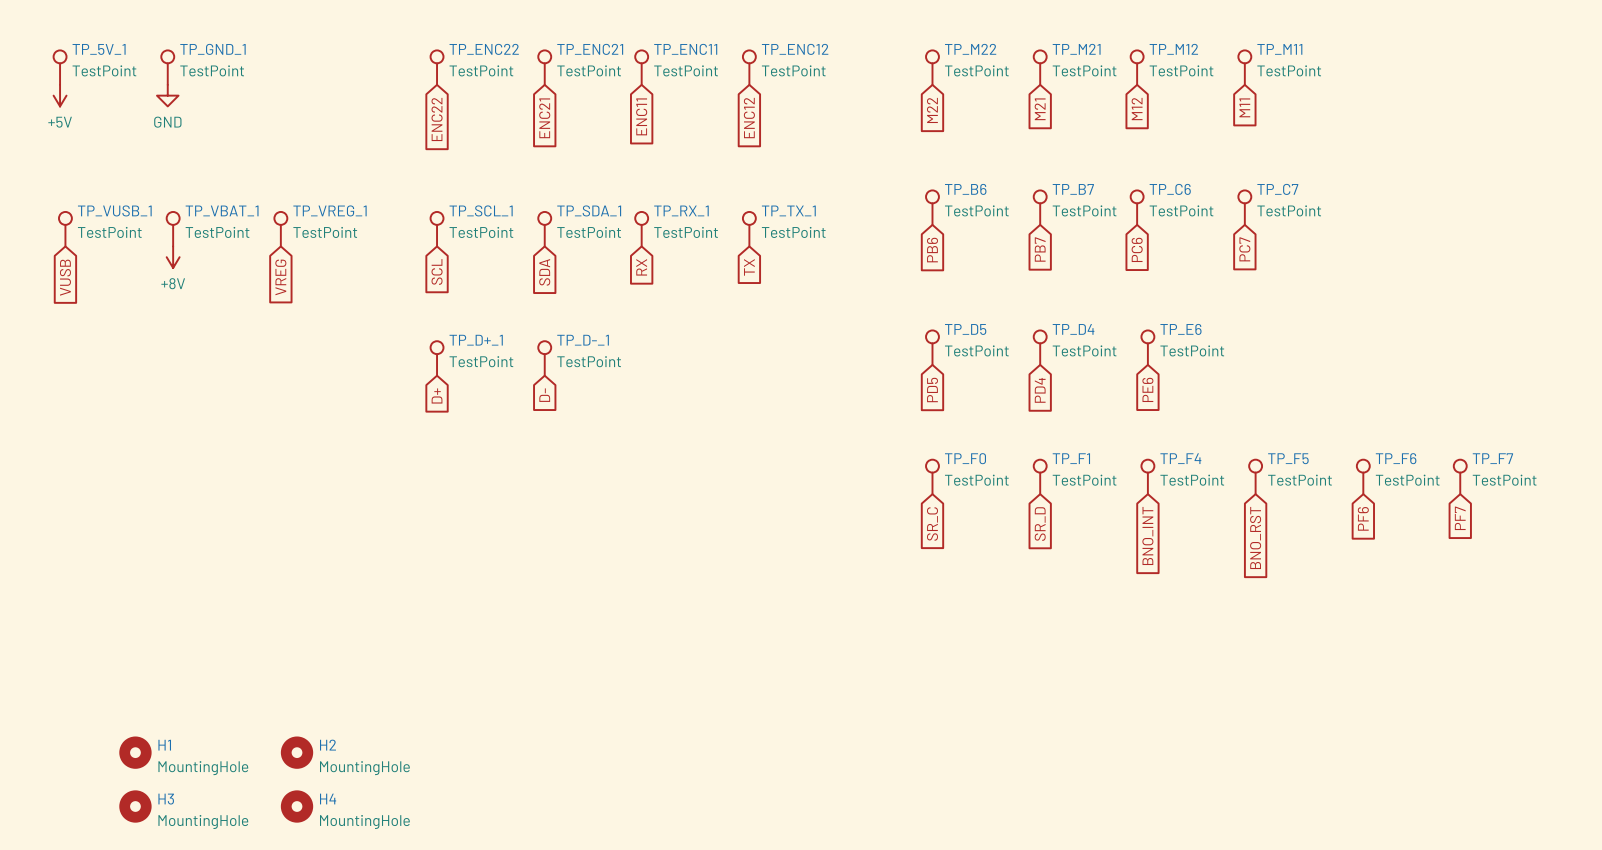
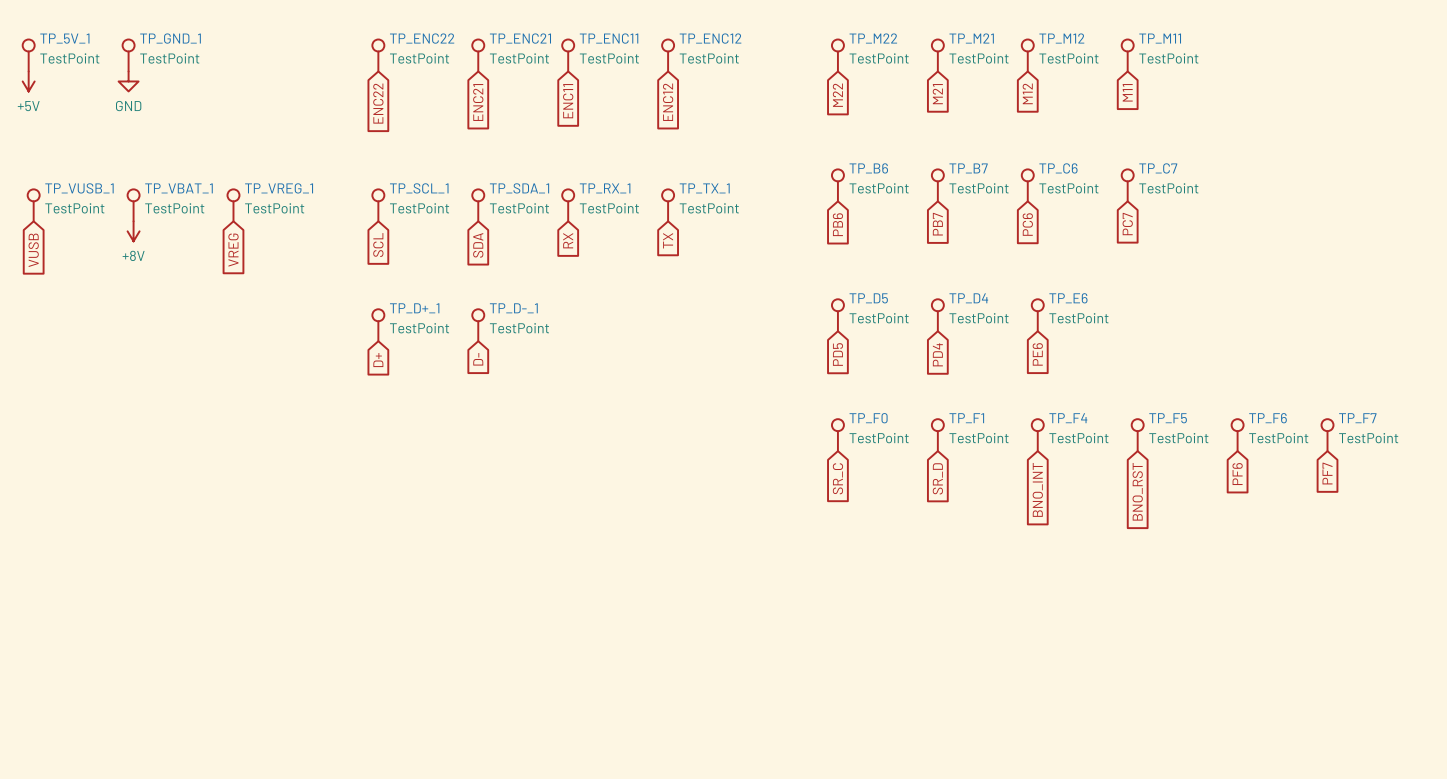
H1: MountingHole (135, 752) -> none
H2: MountingHole (297, 752) -> none
H3: MountingHole (135, 806) -> none
H4: MountingHole (297, 806) -> none

